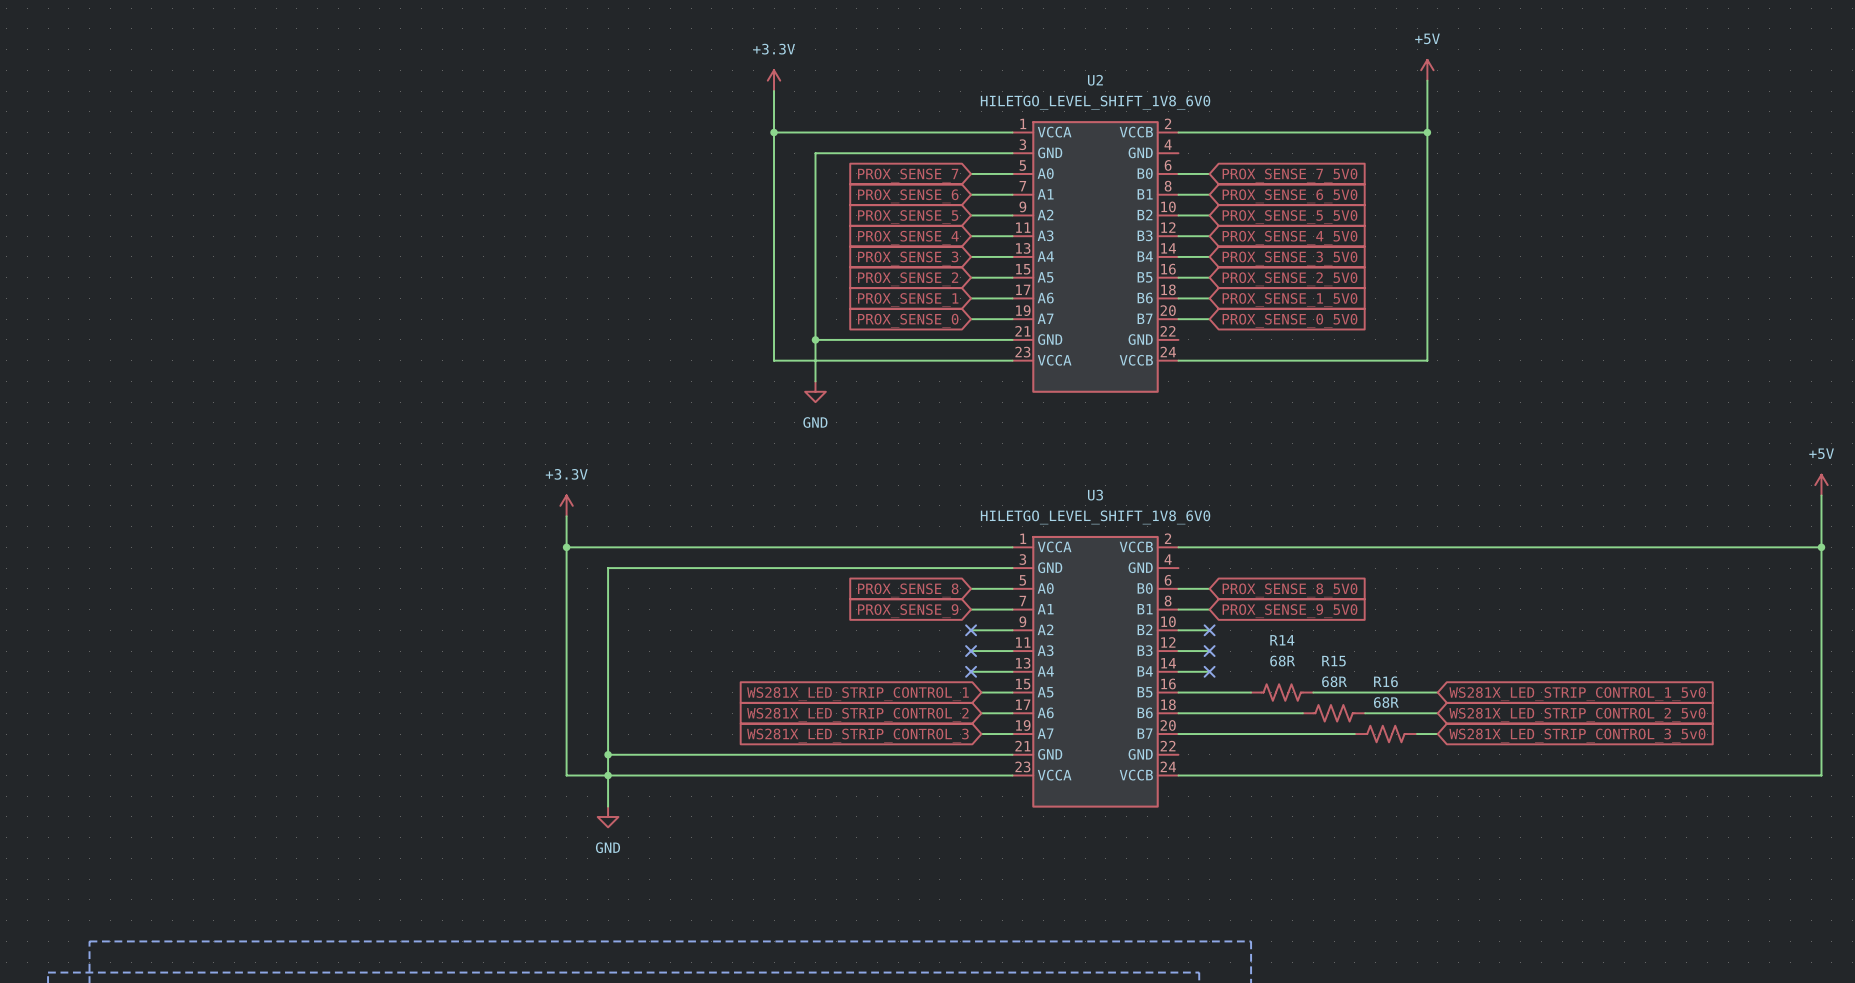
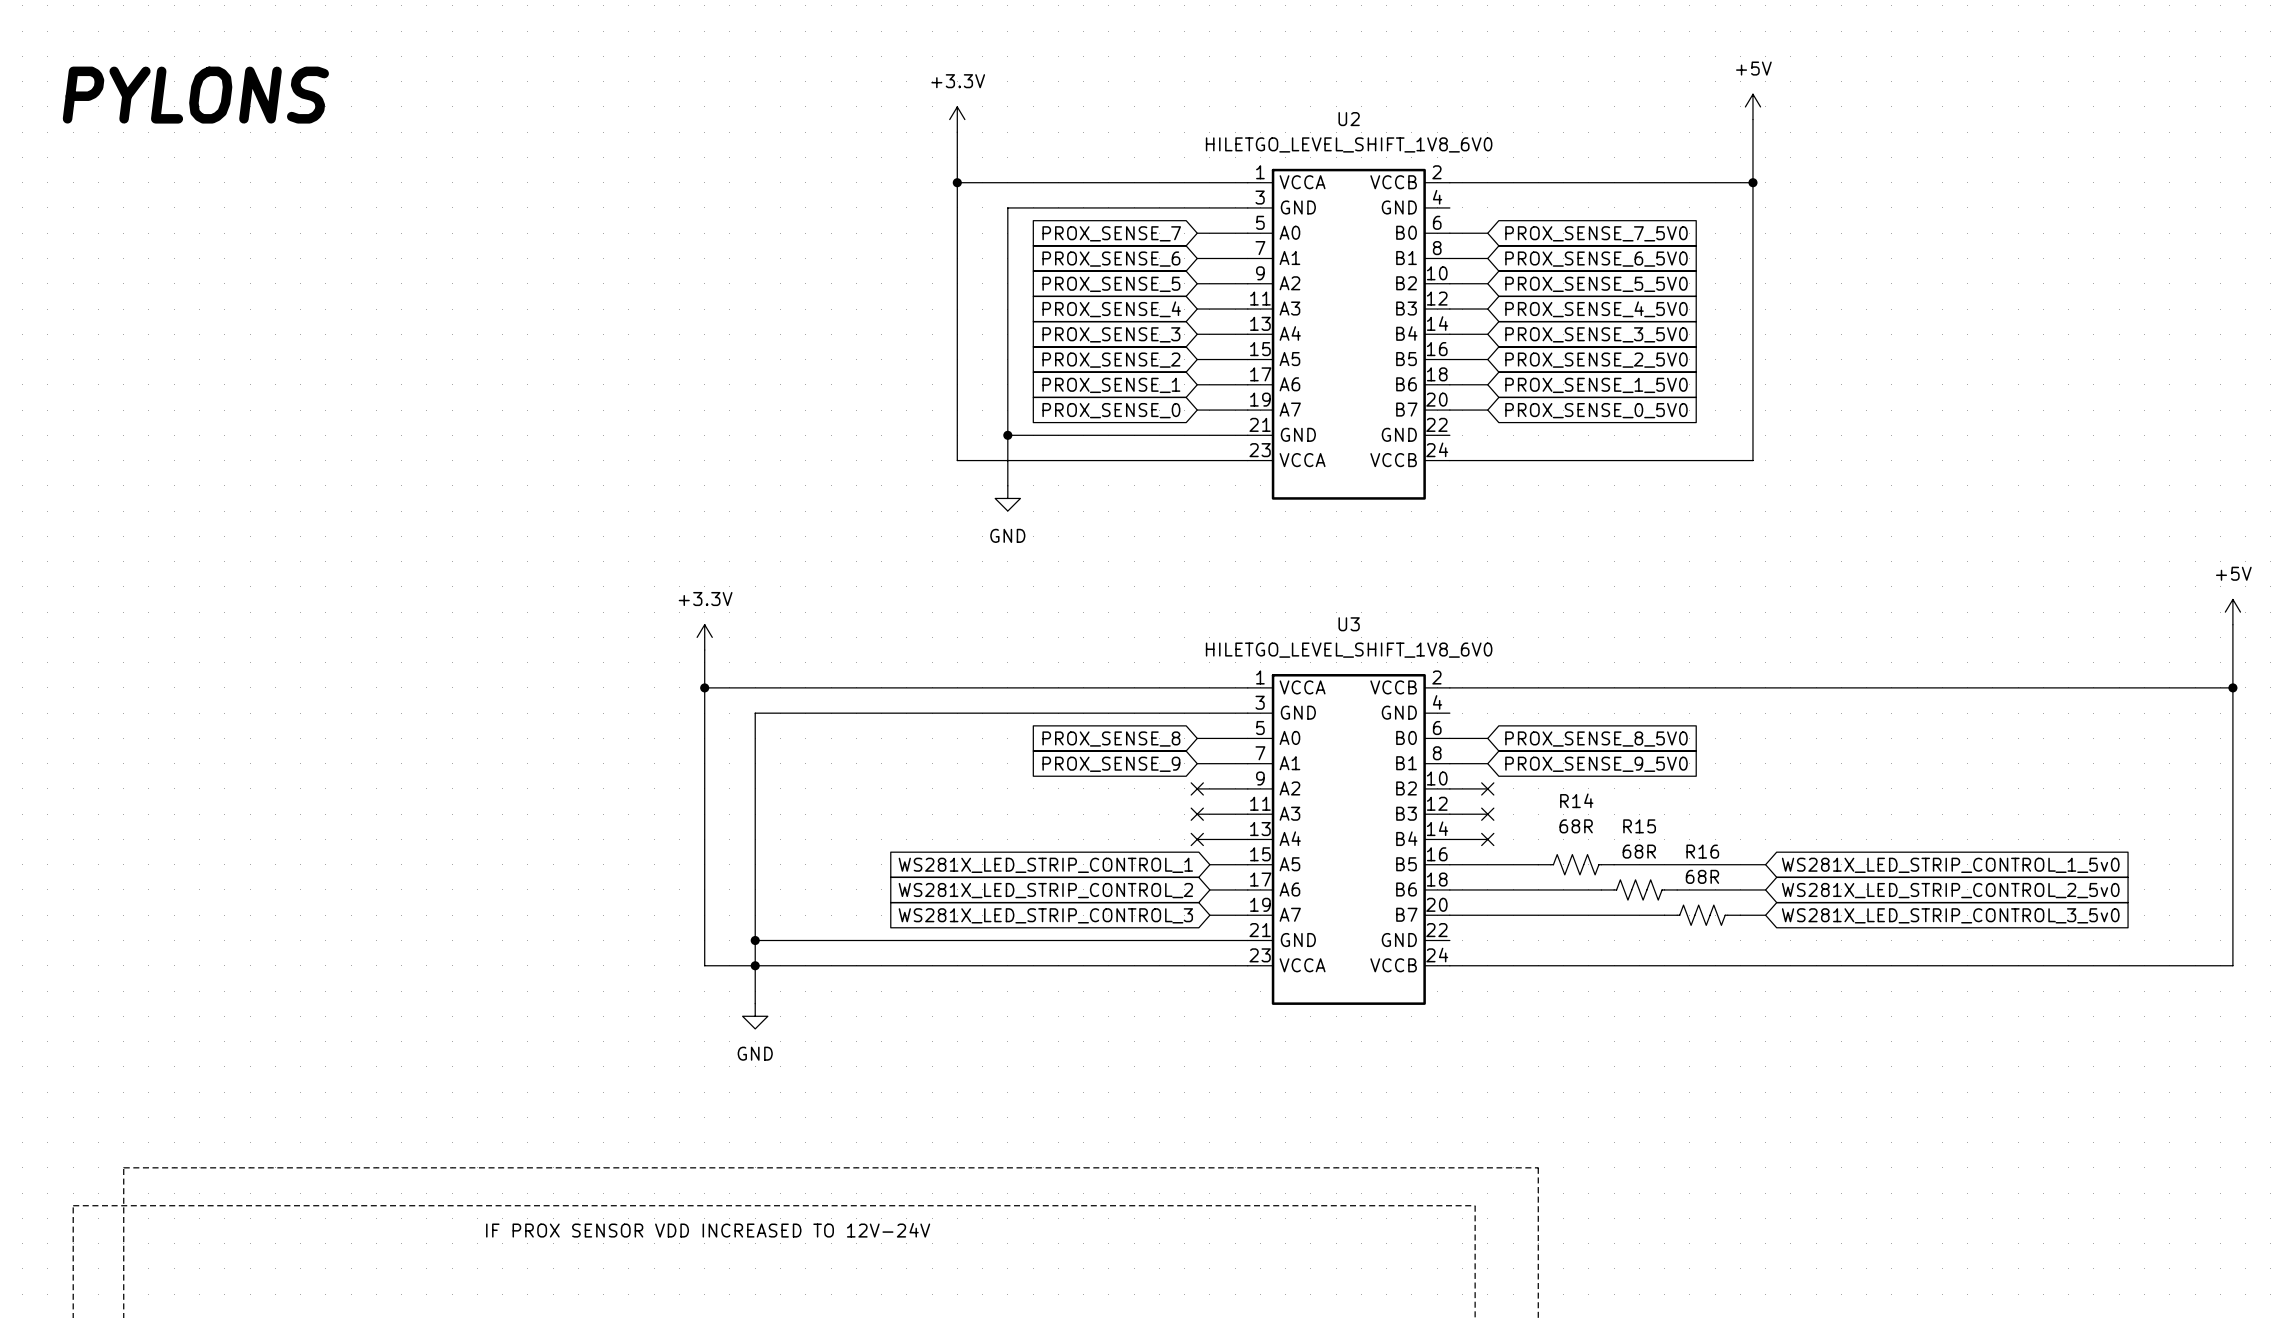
text: none -> PYLONS (195, 95)

